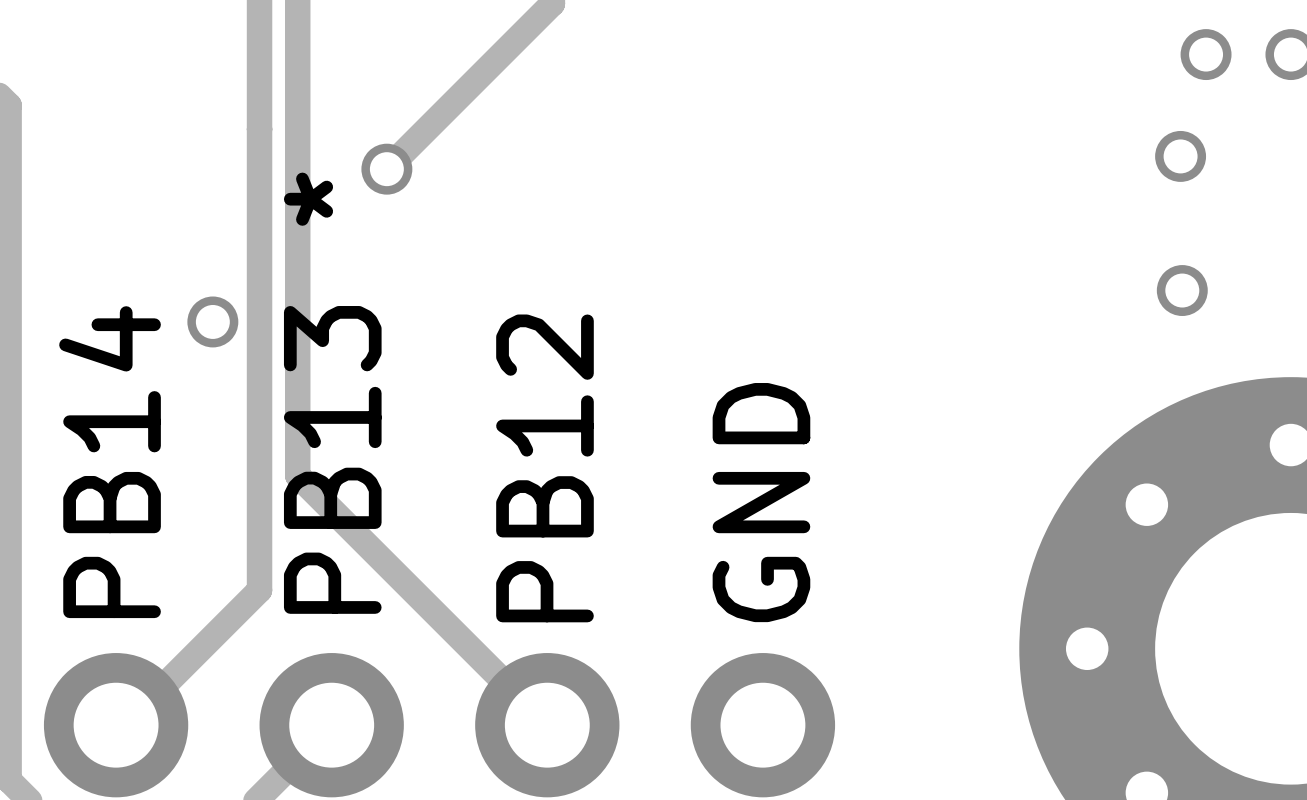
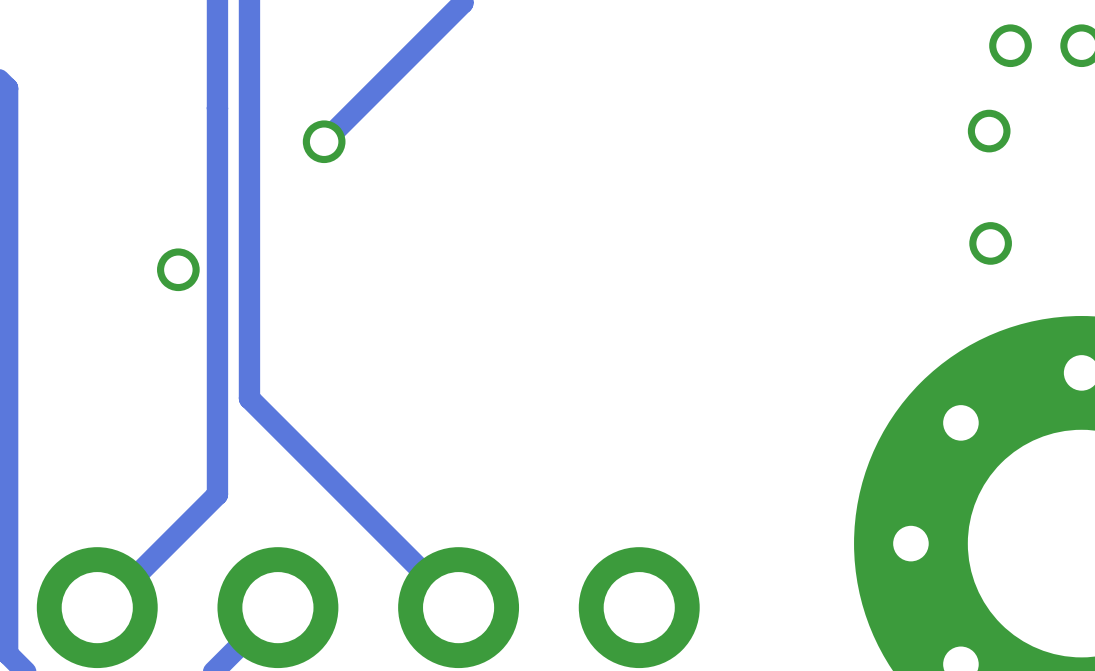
text: PB13 * (332, 393) -> none
text: PB14 (110, 462) -> none
text: PB12 (544, 468) -> none
text: GND (761, 502) -> none

